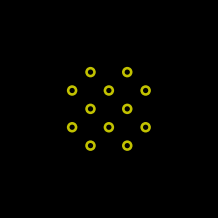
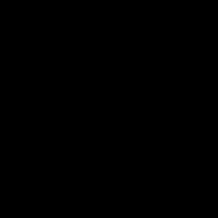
part: (108, 108) -> none

